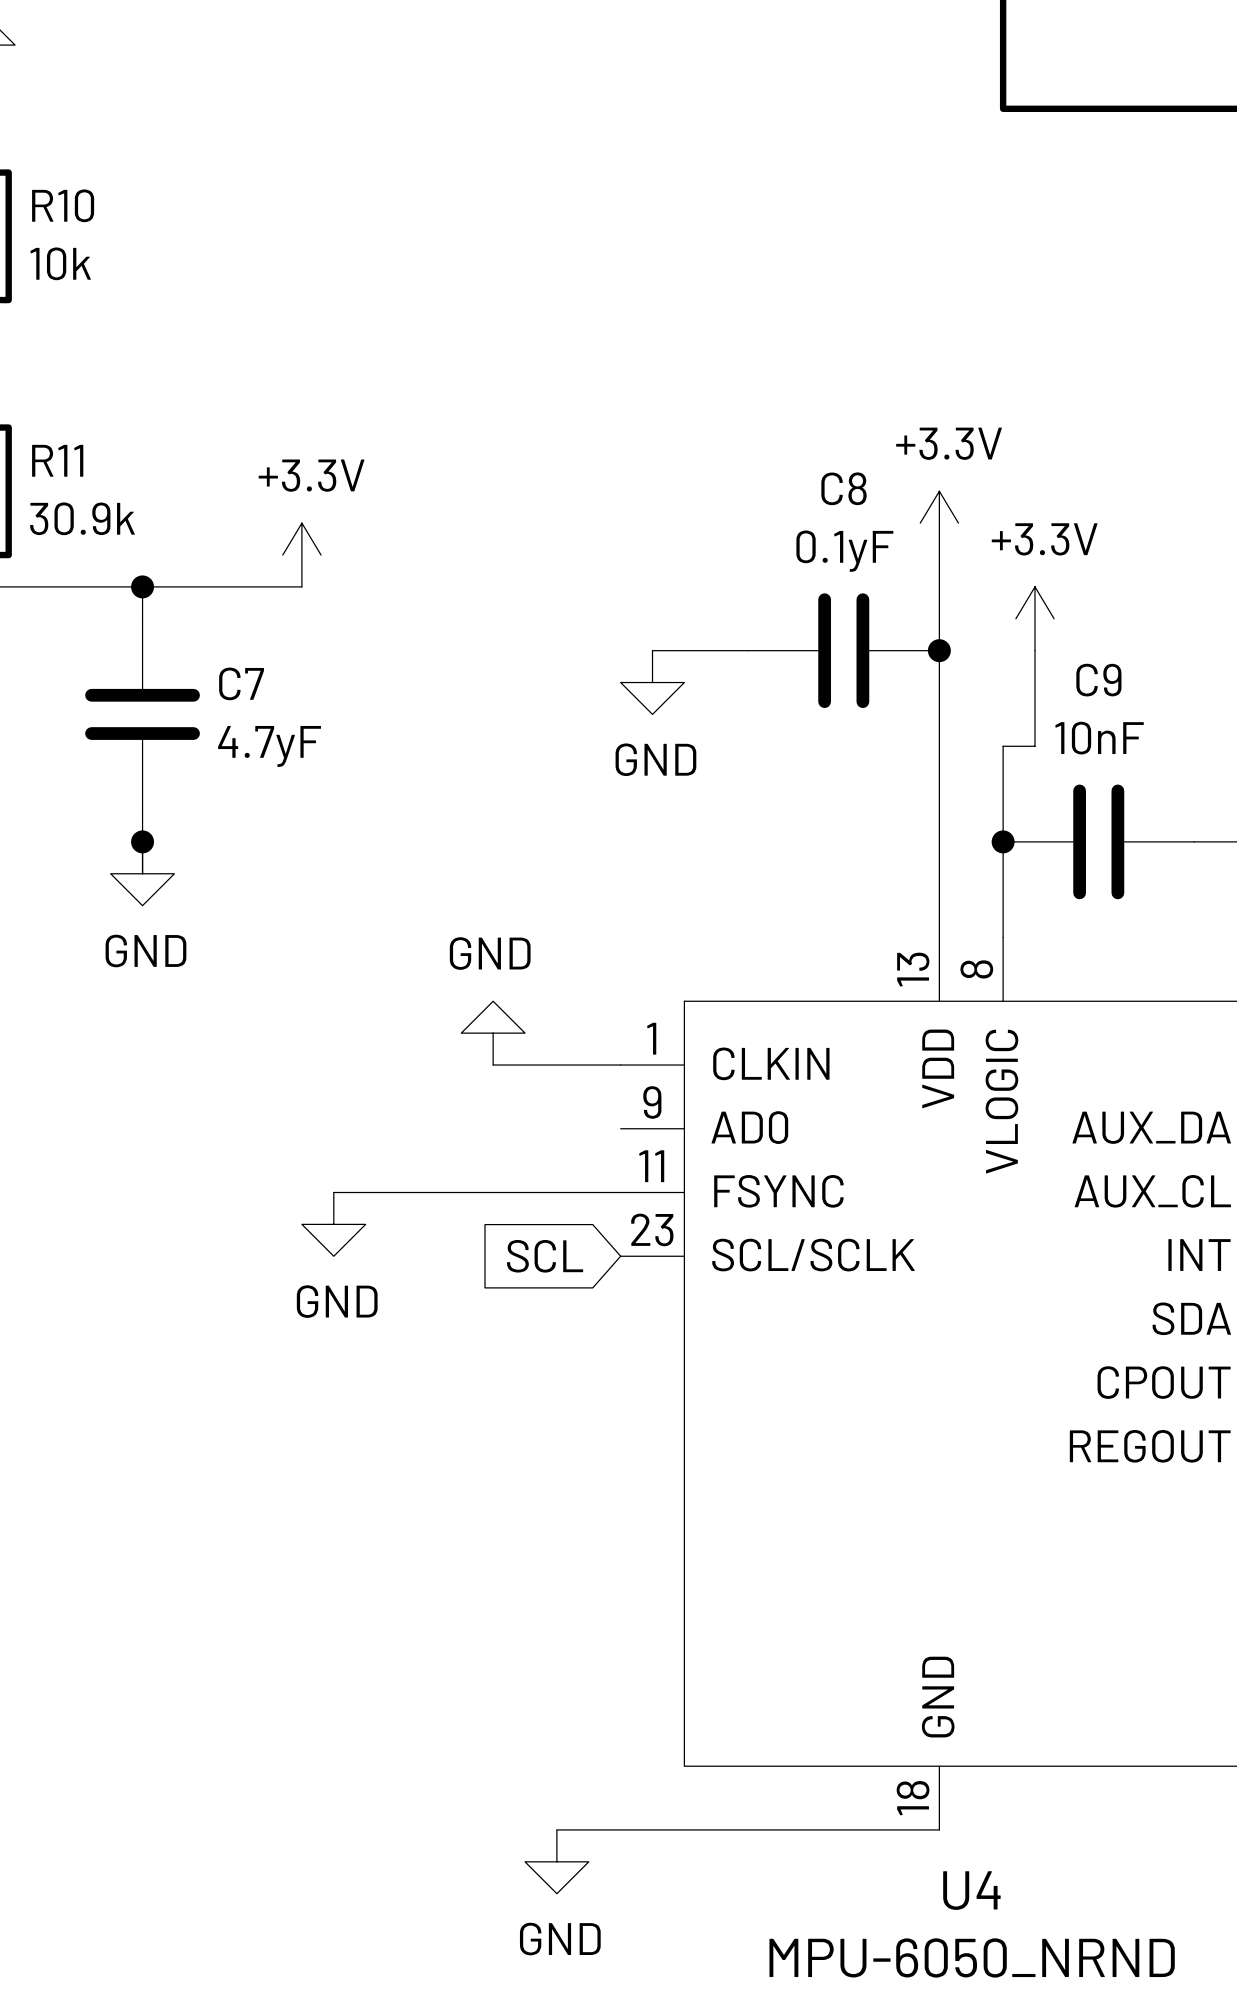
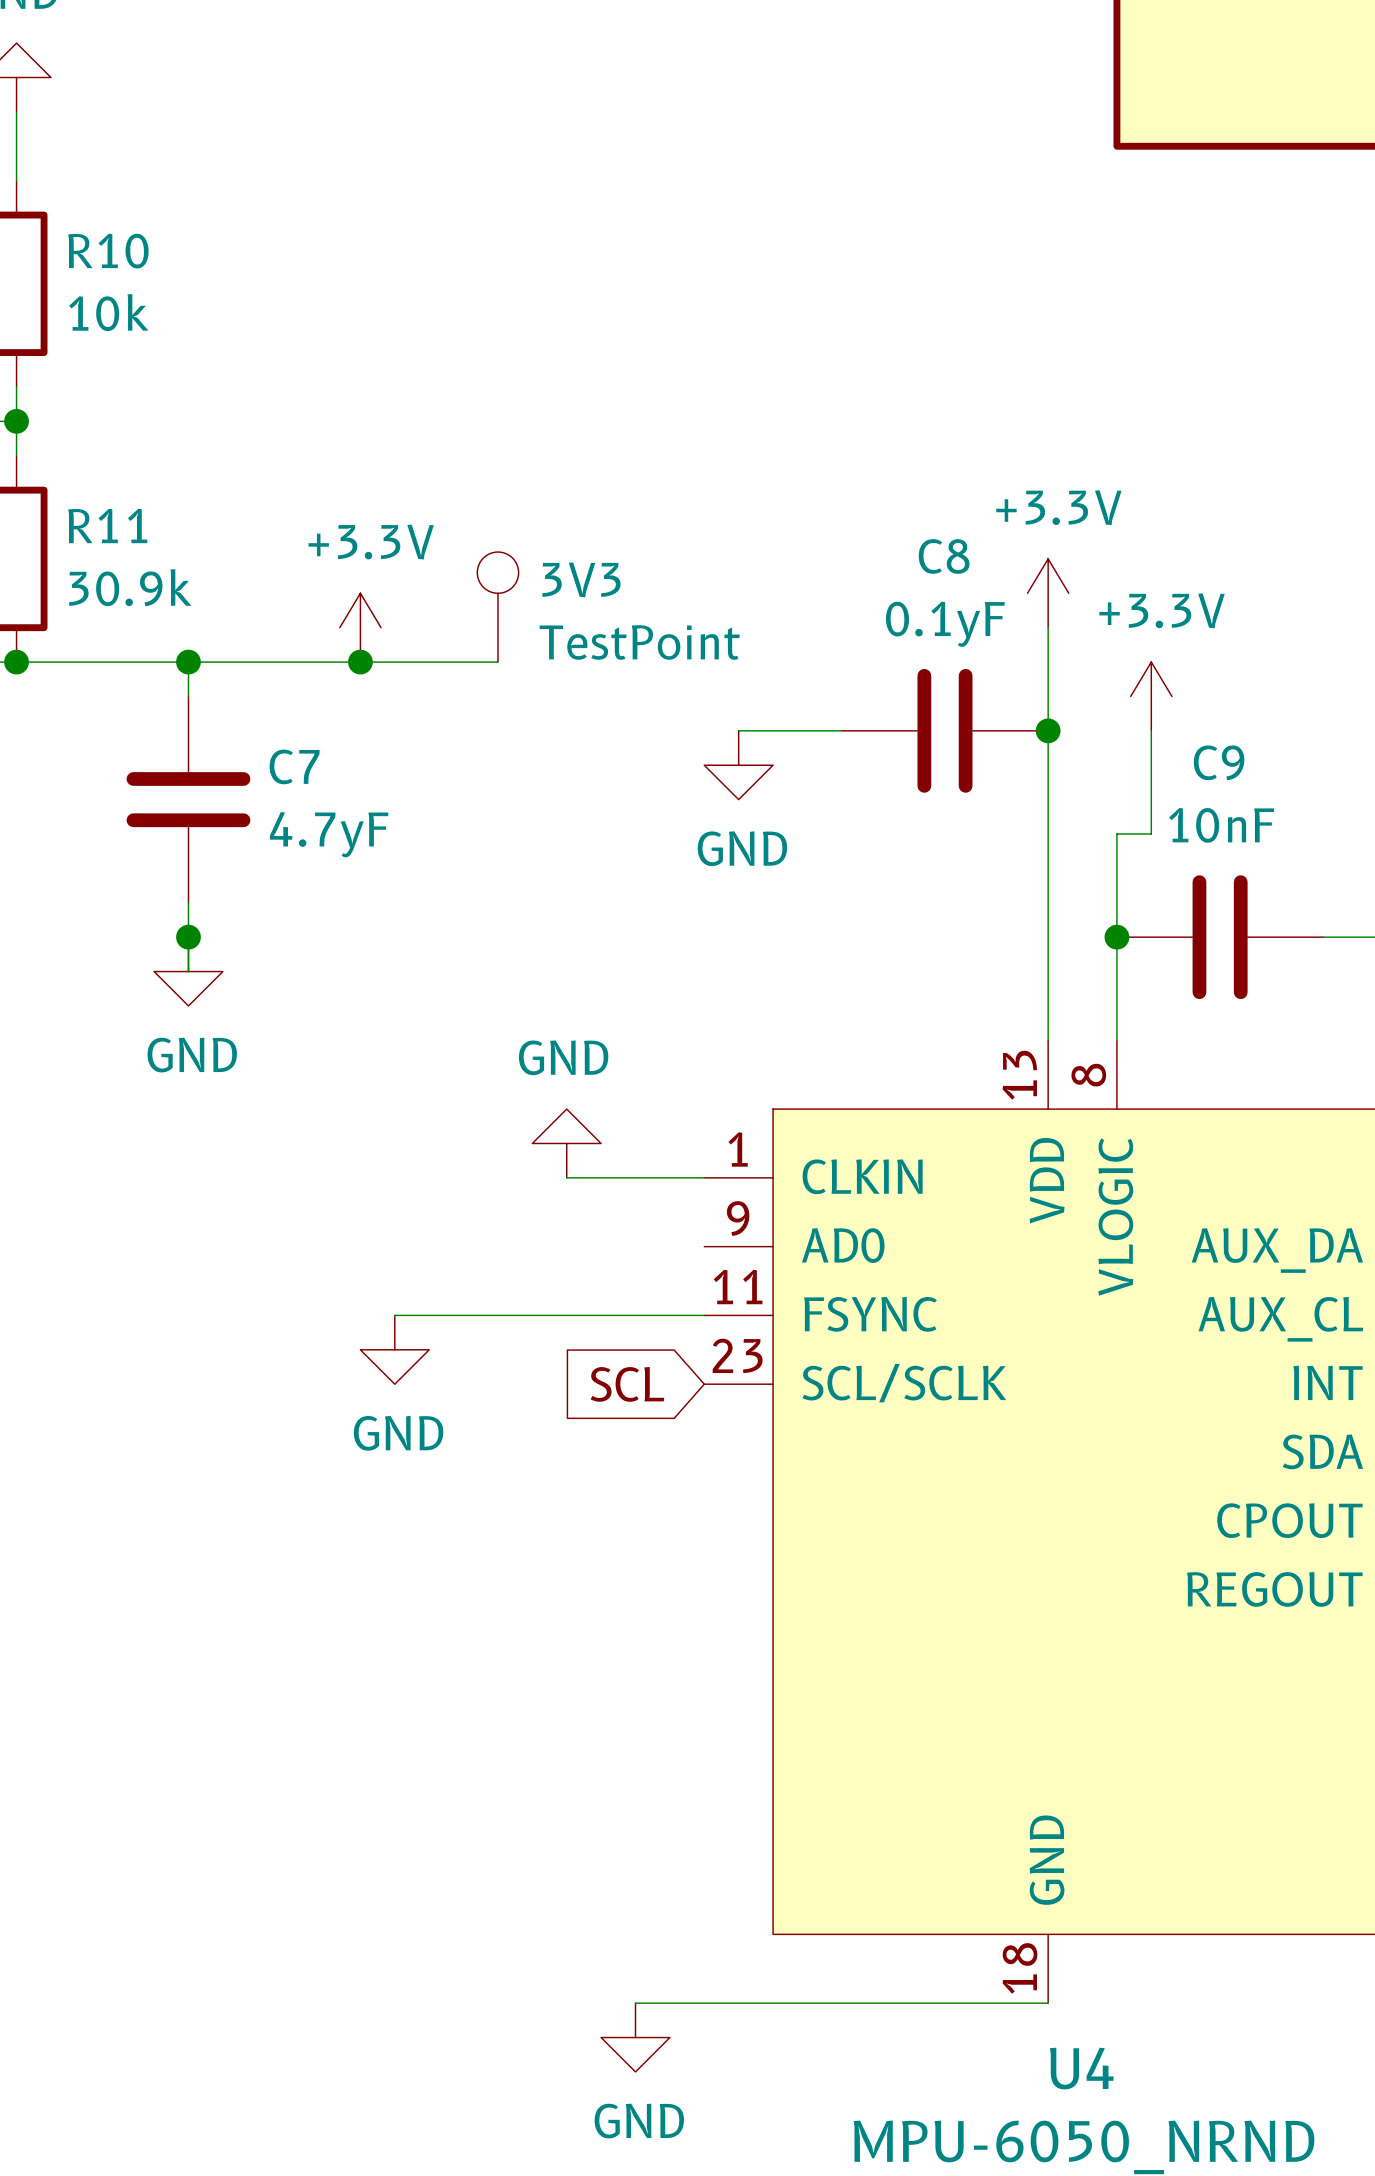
3V3: none -> TestPoint (497, 607)
wire: none -> (360, 662) (497, 662)
junction: none -> (360, 662)

